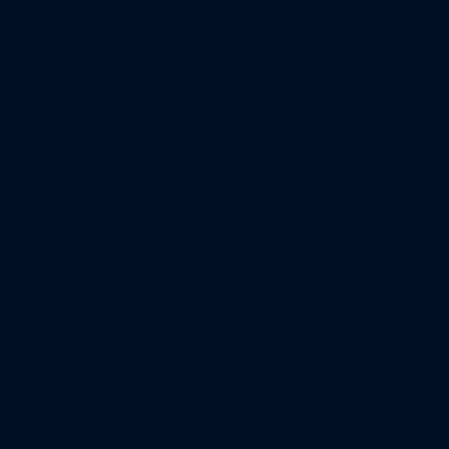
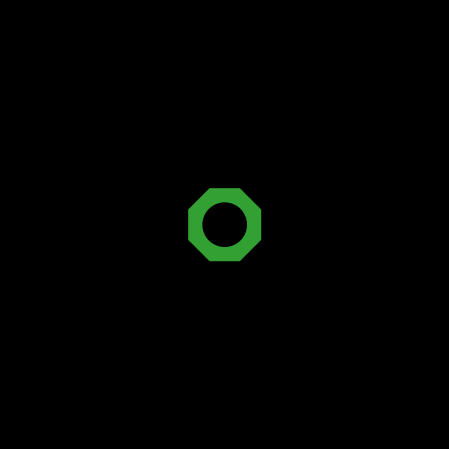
part: none -> (224, 224)

